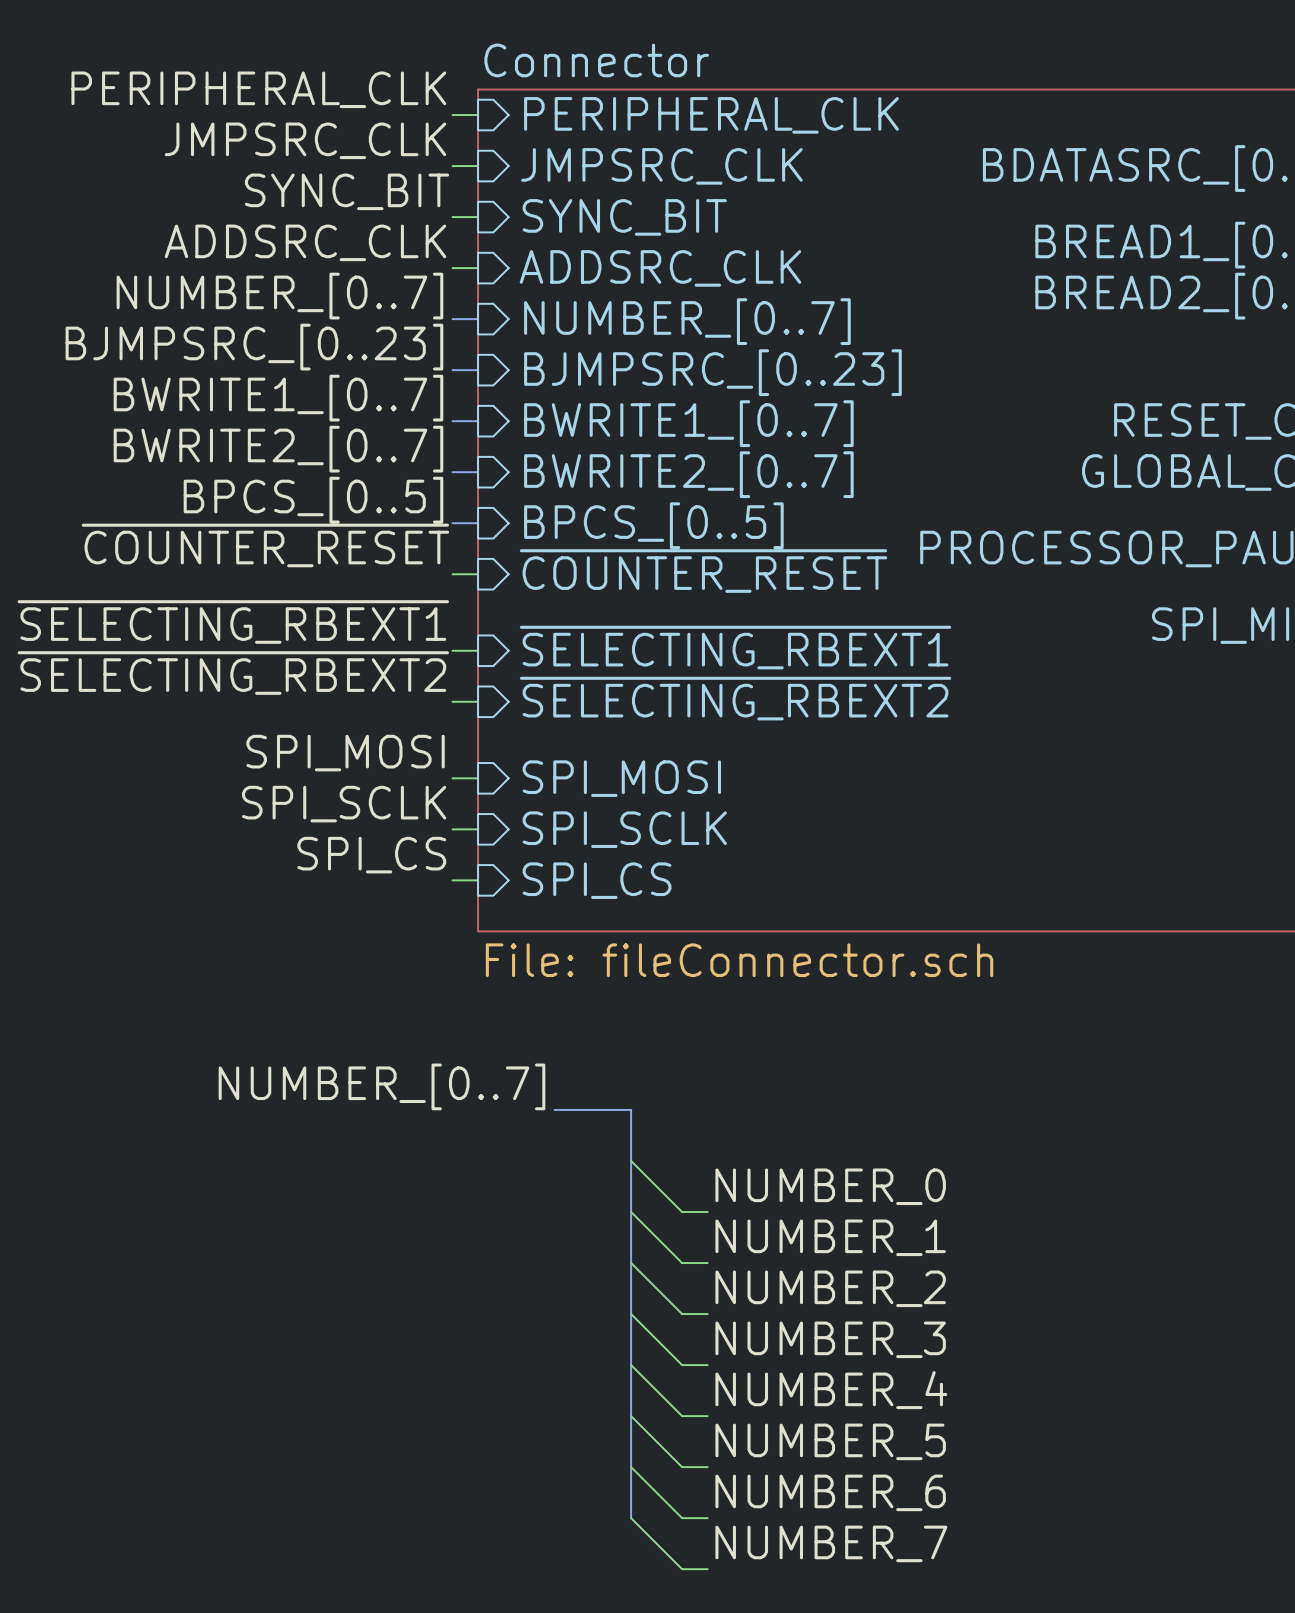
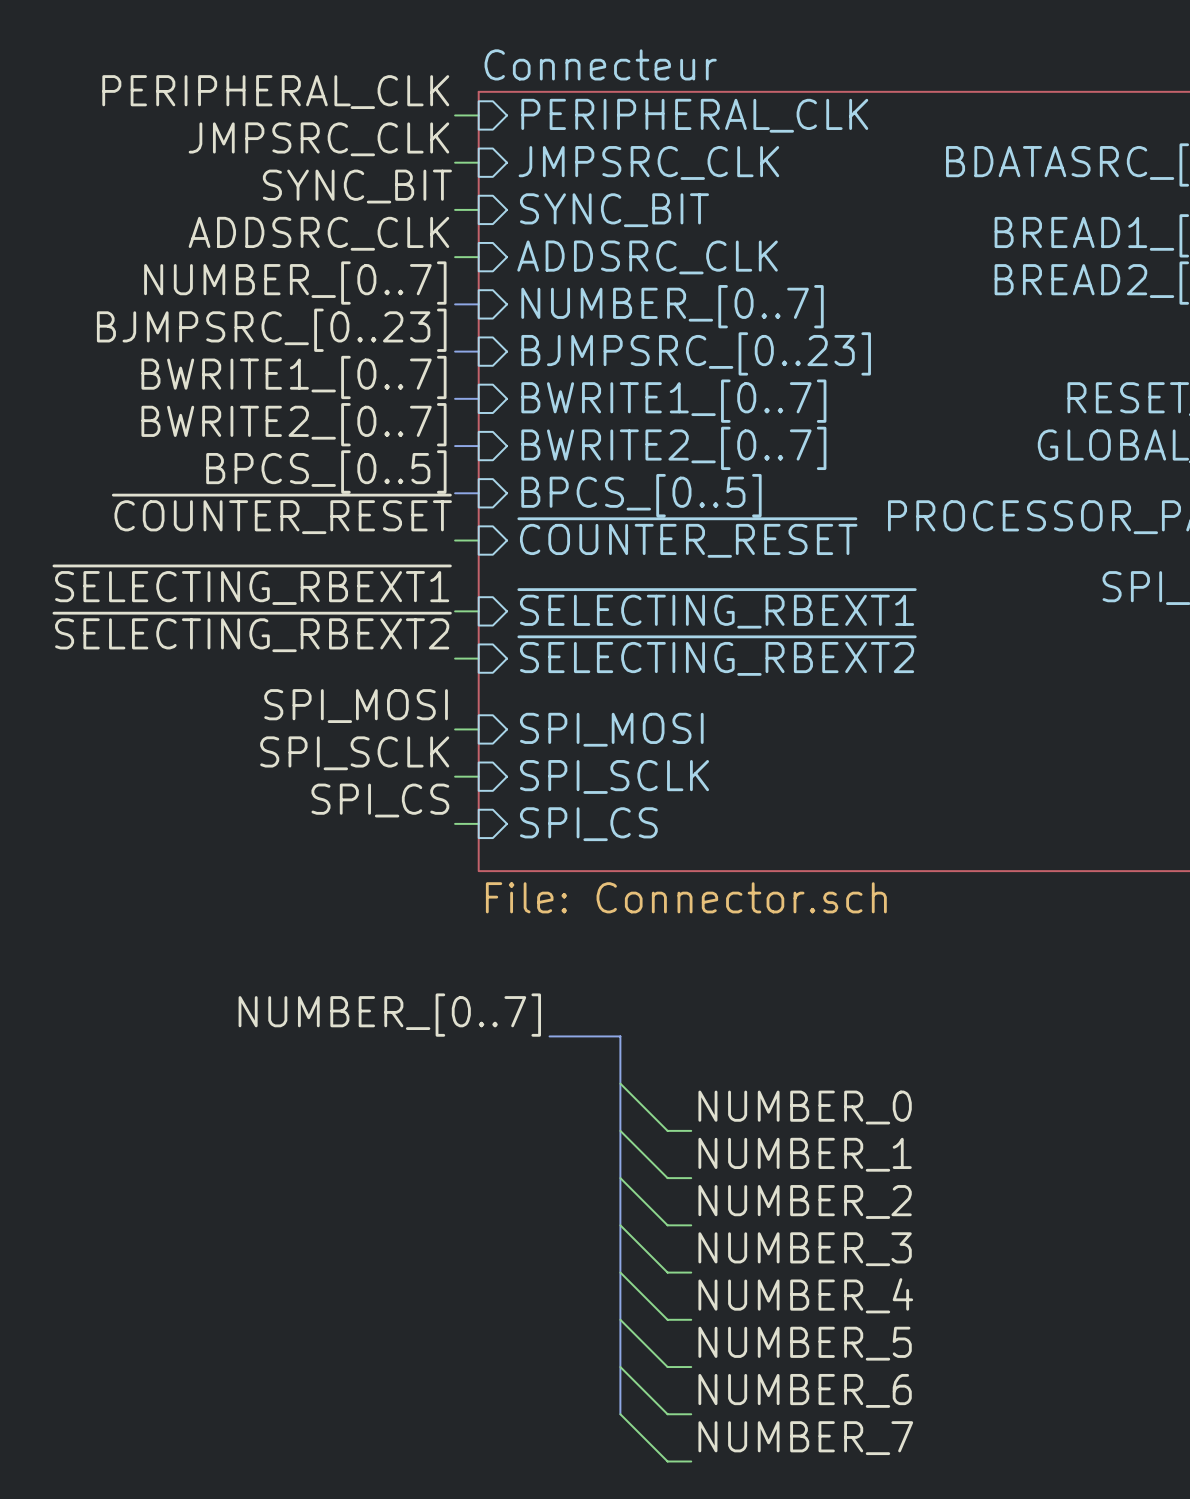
sheet Connector name: Connector (596, 60) -> Connecteur (600, 64)
sheet Connector value: File: fileConnector.sch (739, 960) -> File: Connector.sch (686, 897)

